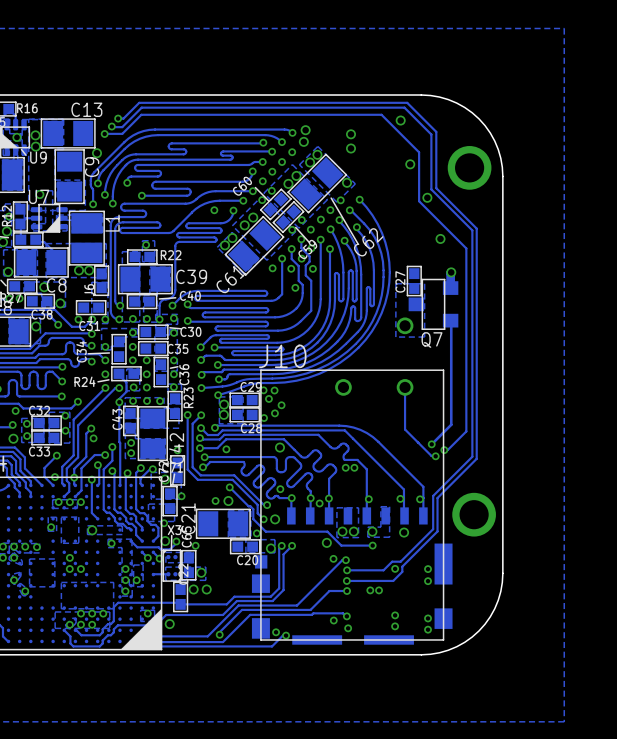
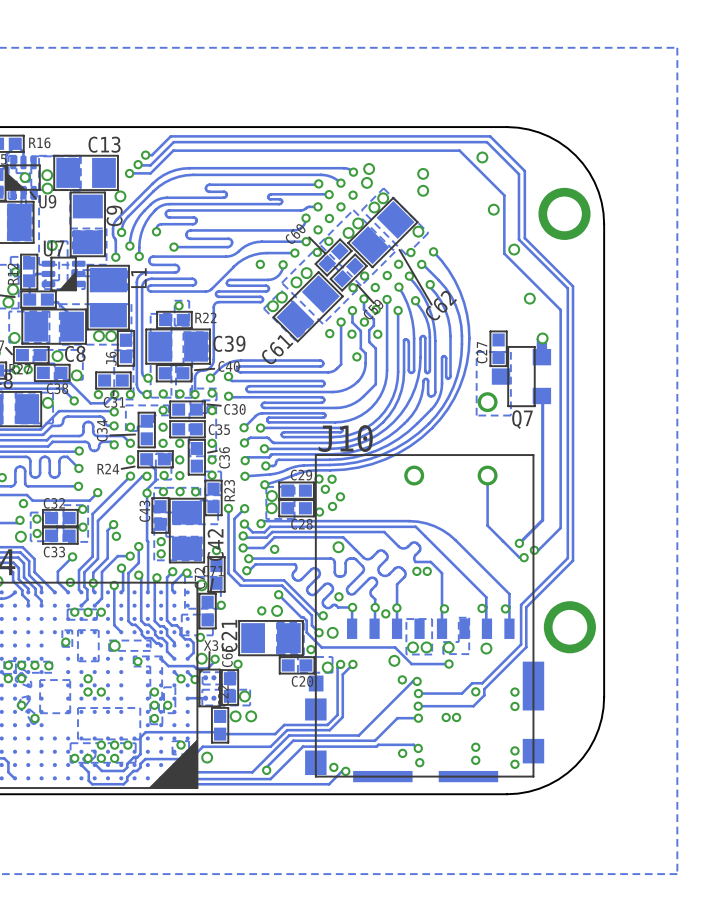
via: none -> (74, 758)

